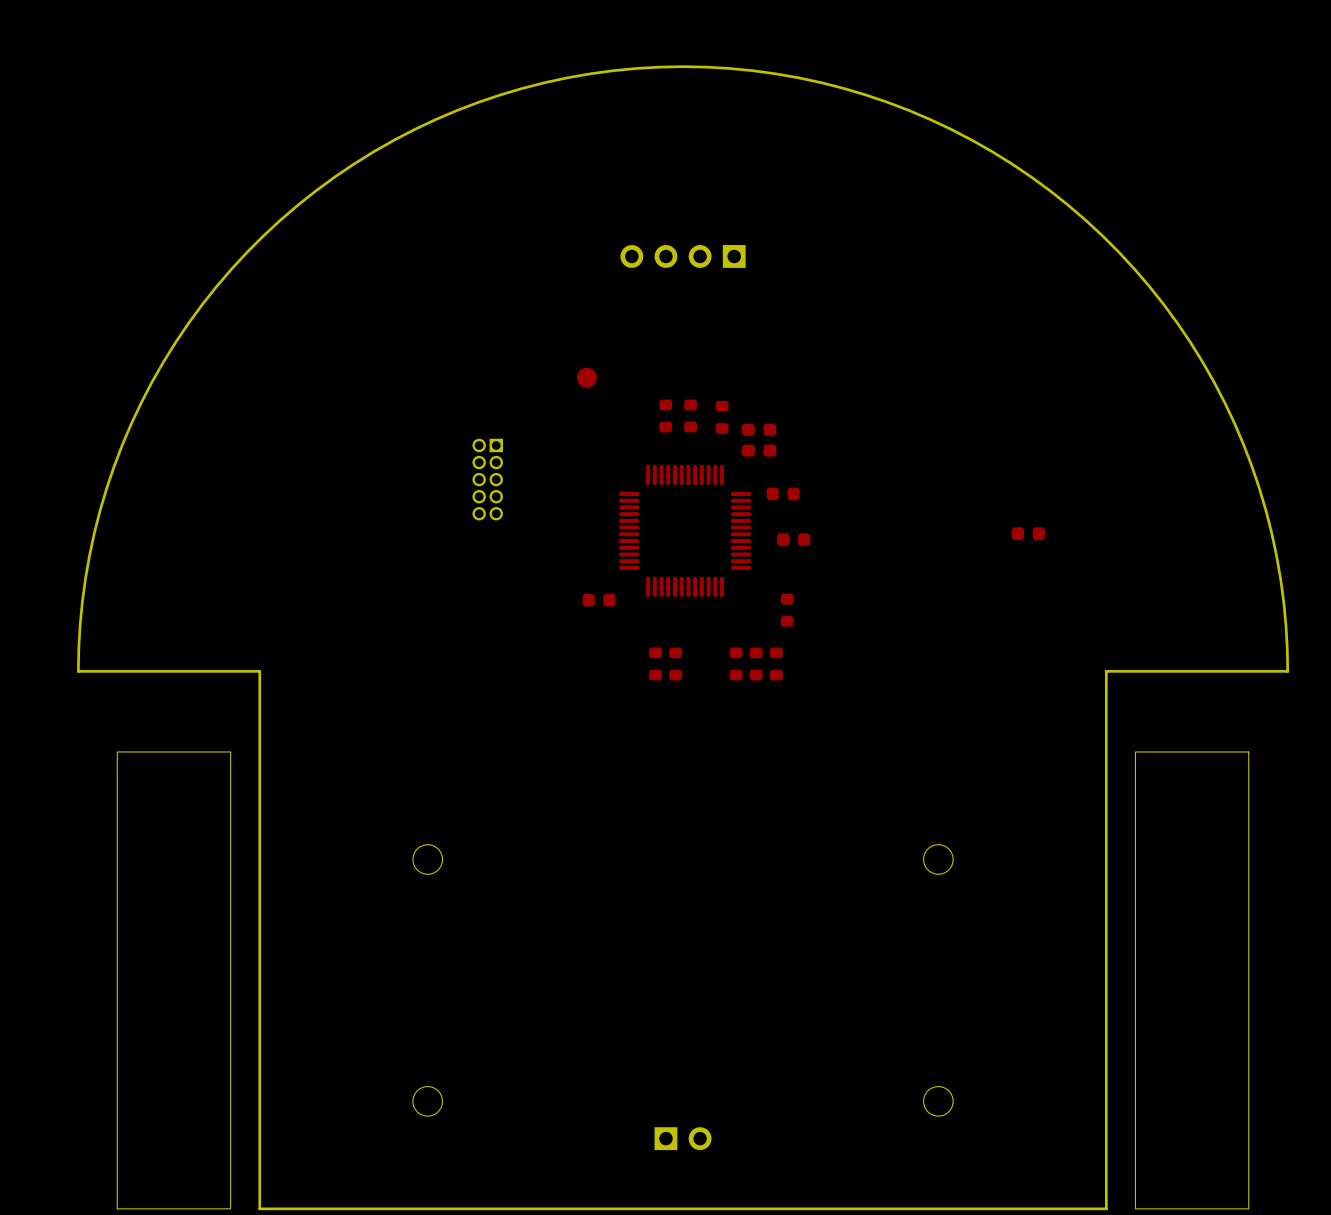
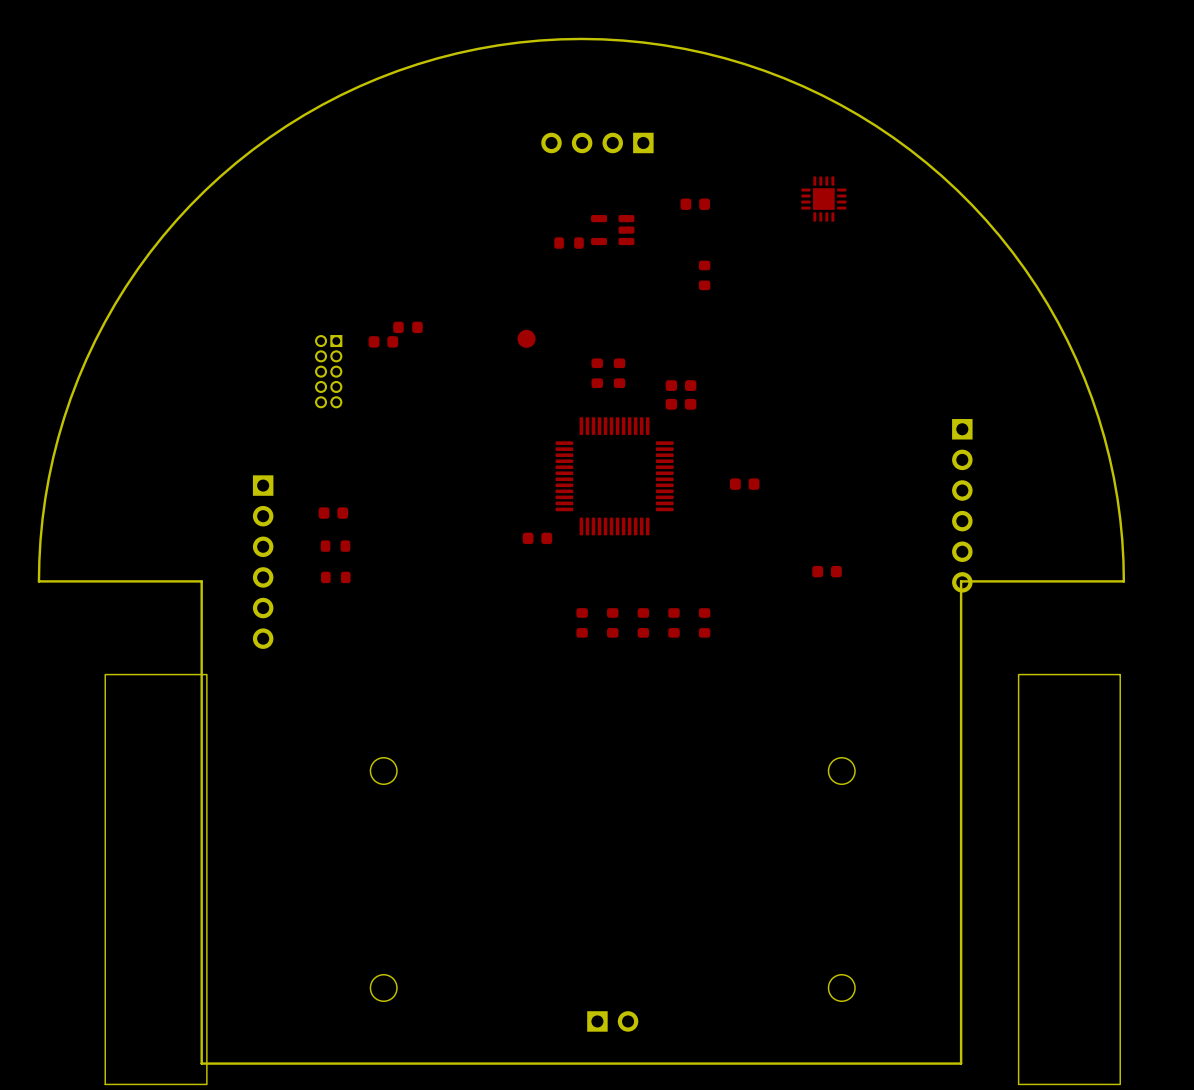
part: none -> (597, 142)
part: none -> (823, 199)
part: none -> (695, 204)
part footprint: [620, 245, 746, 268] -> [591, 215, 635, 246]
part: none -> (569, 243)
part: none -> (704, 275)
part: none -> (407, 327)
part: none -> (383, 341)
part: (722, 417) -> none
part position: (487, 479) -> (328, 371)
part: (783, 493) -> none
part: (1028, 533) -> none
part: (793, 539) -> none
part: none -> (744, 484)
part: none -> (962, 505)
part: none -> (333, 513)
part: none -> (335, 546)
part: (787, 610) -> none
part: none -> (263, 562)
part: none -> (827, 571)
part: none -> (335, 577)
part: (655, 663) -> none
part: (675, 663) -> none
part: (736, 663) -> none
part: (756, 663) -> none
part: (776, 663) -> none
board edge: (1287, 671) (1106, 671) (1106, 1208) (259, 1208) (259, 671) (78, 671) (82, 602) (89, 556) (99, 511) (122, 445) (141, 403) (175, 342) (202, 304) (247, 252) (298, 204) (354, 163) (394, 140) (457, 110) (522, 88) (567, 77) (613, 70) (683, 66) (729, 68) (798, 77) (843, 88) (909, 110) (971, 140) (1011, 163) (1067, 204) (1102, 235) (1149, 286) (1177, 323) (1202, 362) (1234, 423) (1252, 466) (1271, 533) (1283, 602) (1287, 671) -> (1123, 581) (961, 581) (961, 1063) (201, 1063) (201, 581) (38, 581) (42, 519) (53, 457) (70, 398) (86, 359) (115, 304) (137, 269) (162, 236) (205, 190) (252, 149) (286, 126) (322, 104) (378, 78) (417, 64) (478, 48) (519, 42) (581, 38) (643, 42) (684, 48) (725, 58) (784, 78) (840, 104) (893, 137) (926, 162) (972, 205) (999, 236) (1036, 286) (1057, 322) (1084, 378) (1104, 437) (1113, 478) (1122, 539) (1123, 581)
part: none -> (582, 622)
part: none -> (612, 622)
part: none -> (643, 622)
part: none -> (673, 622)
part: none -> (704, 622)

